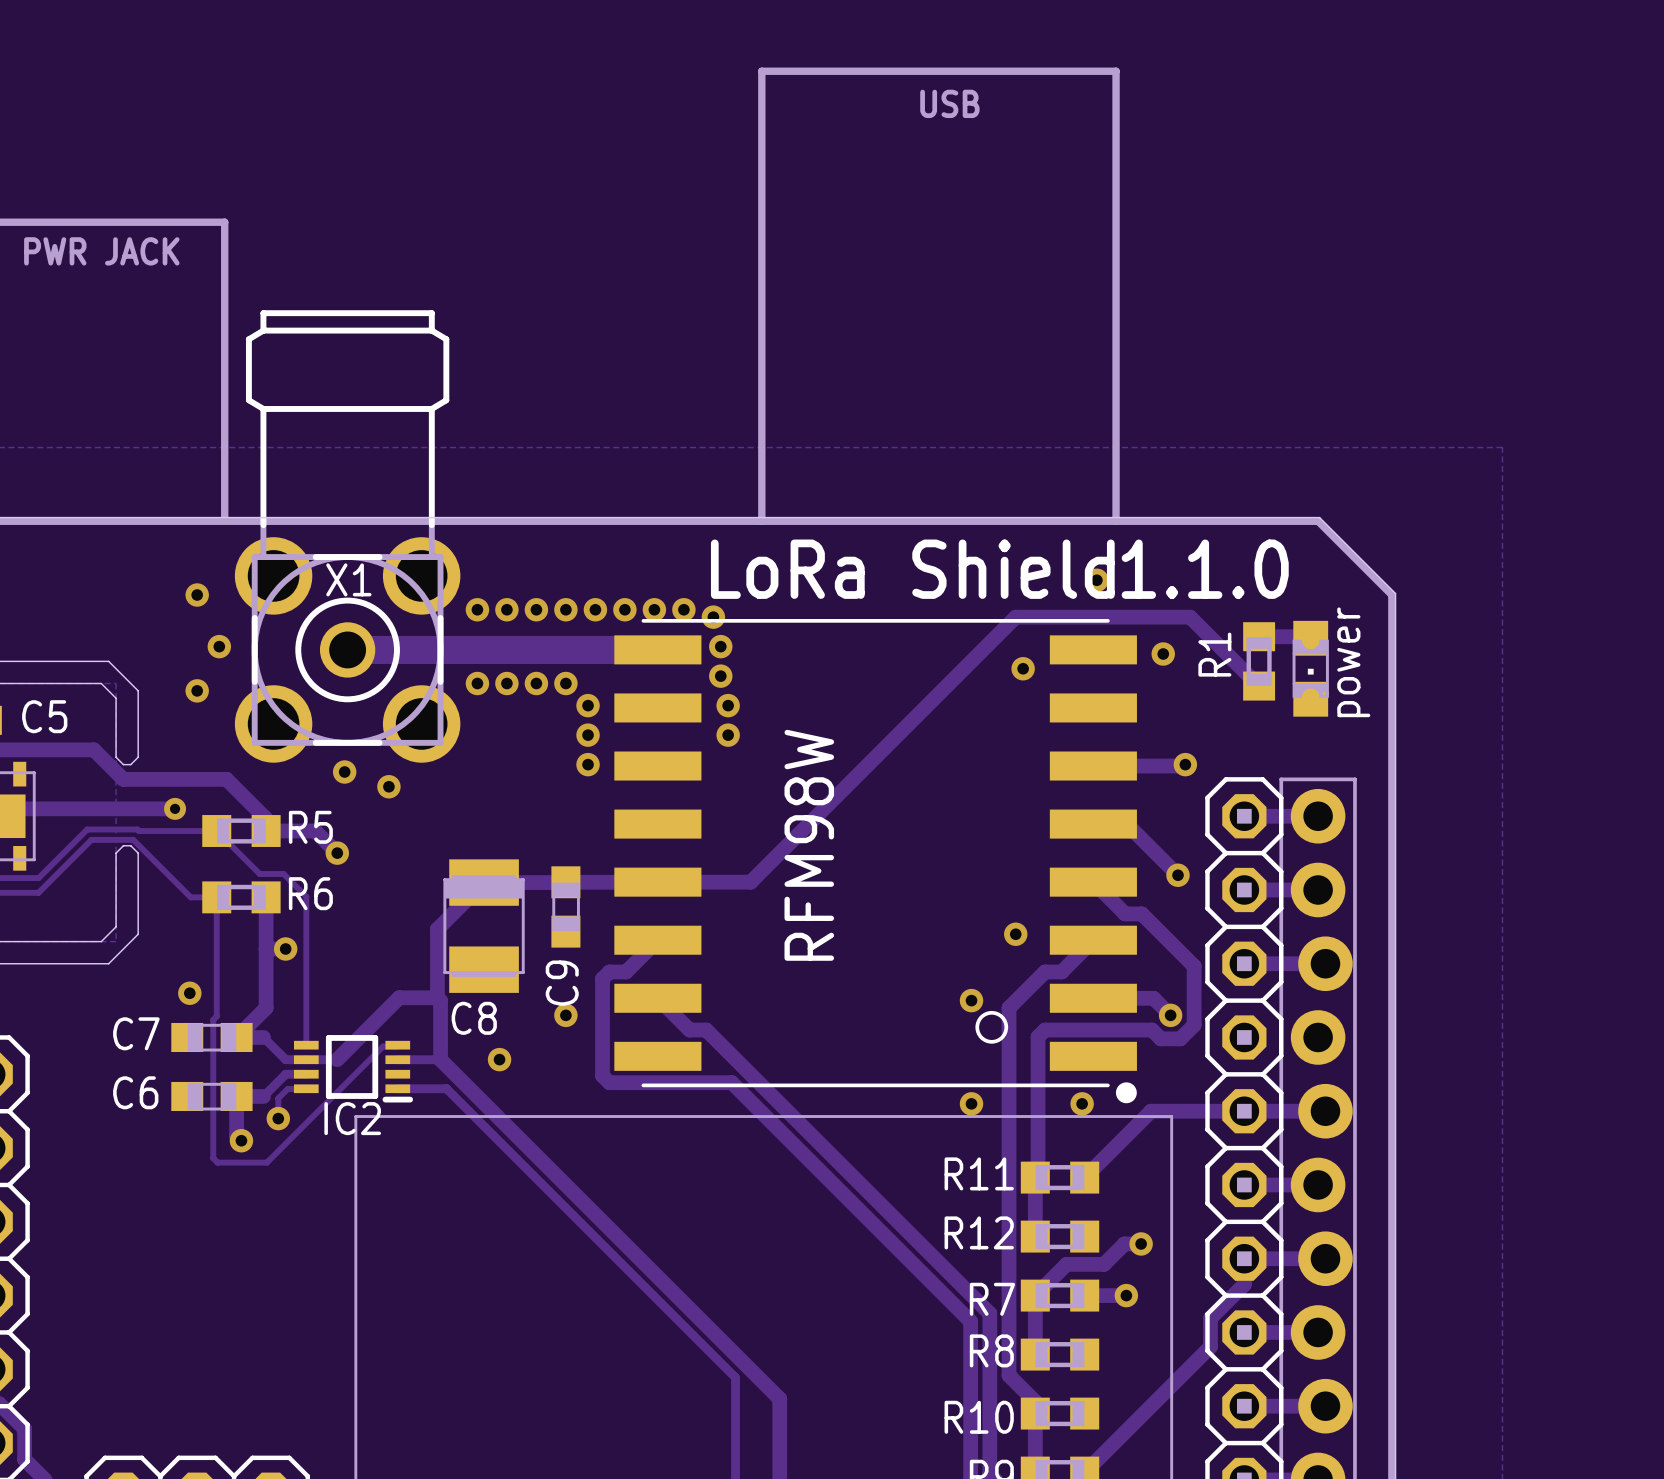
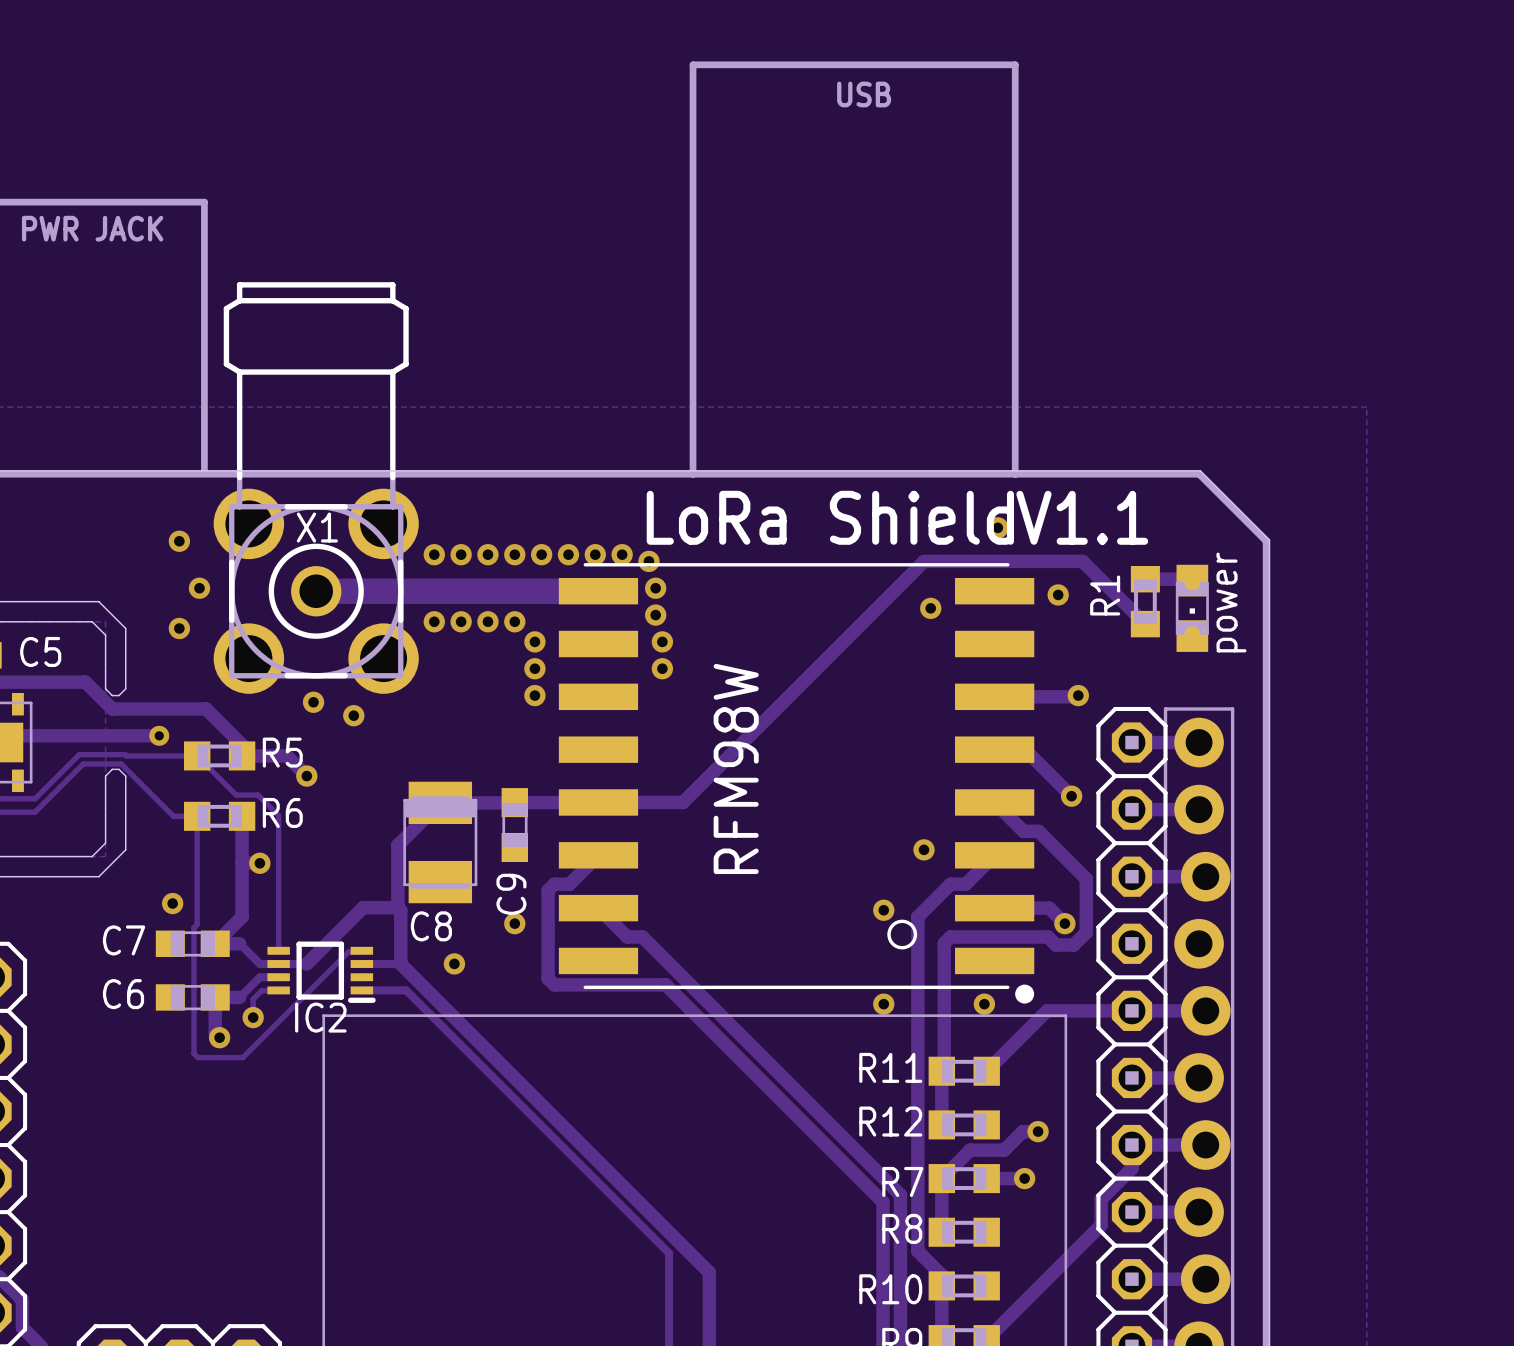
text: 1.1.0 (1205, 569) -> V1.1 (1082, 517)

